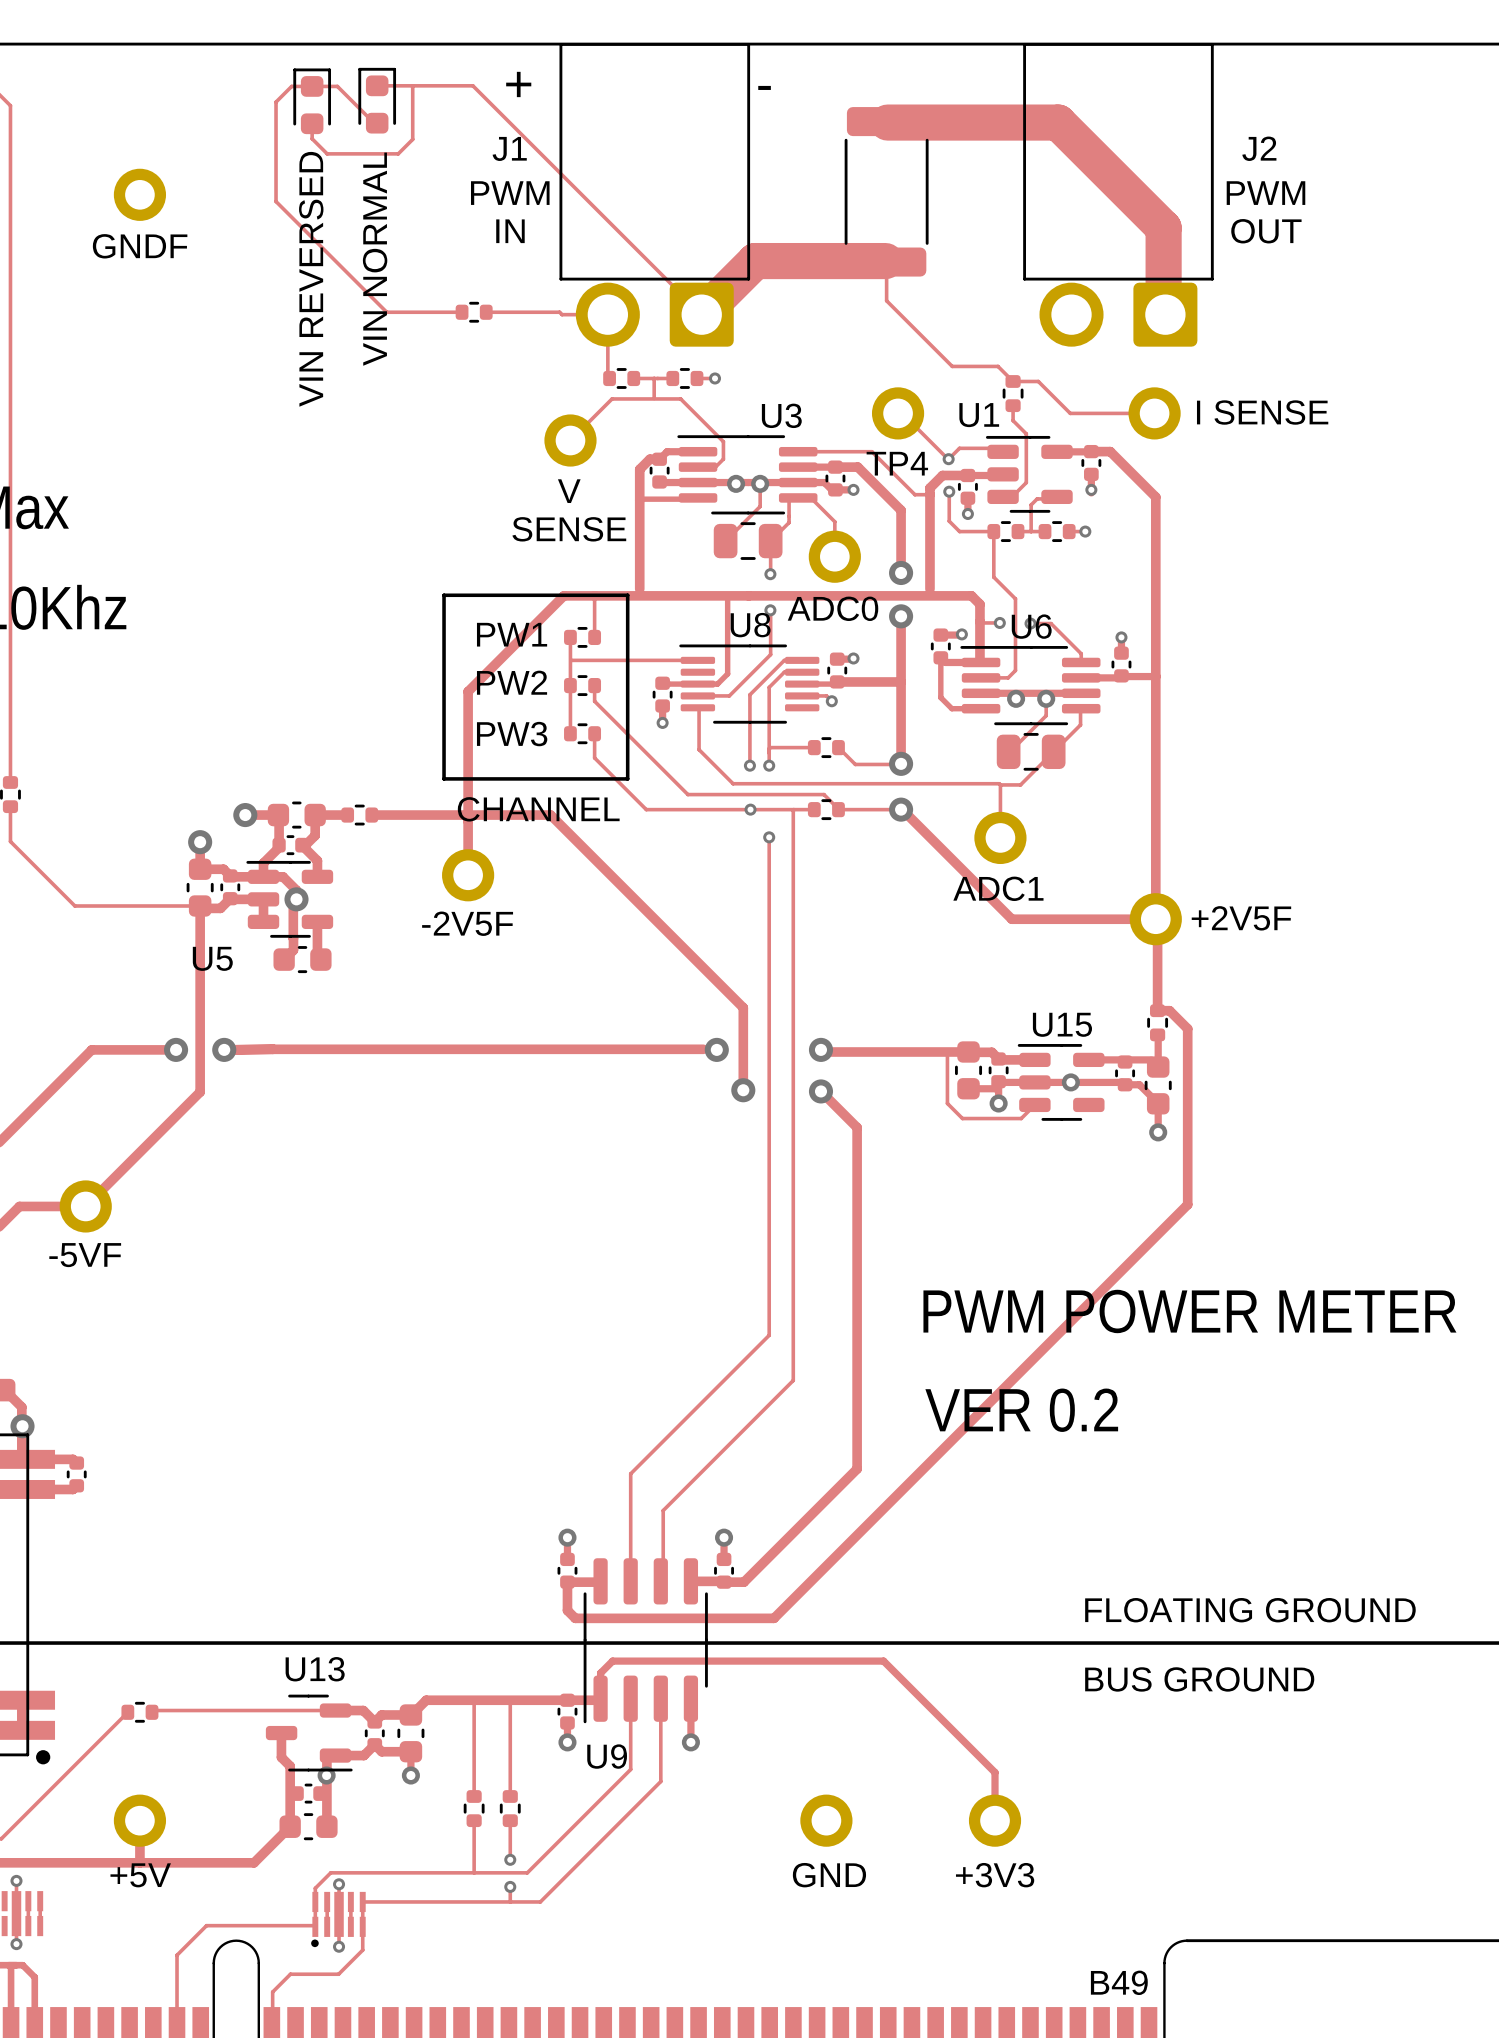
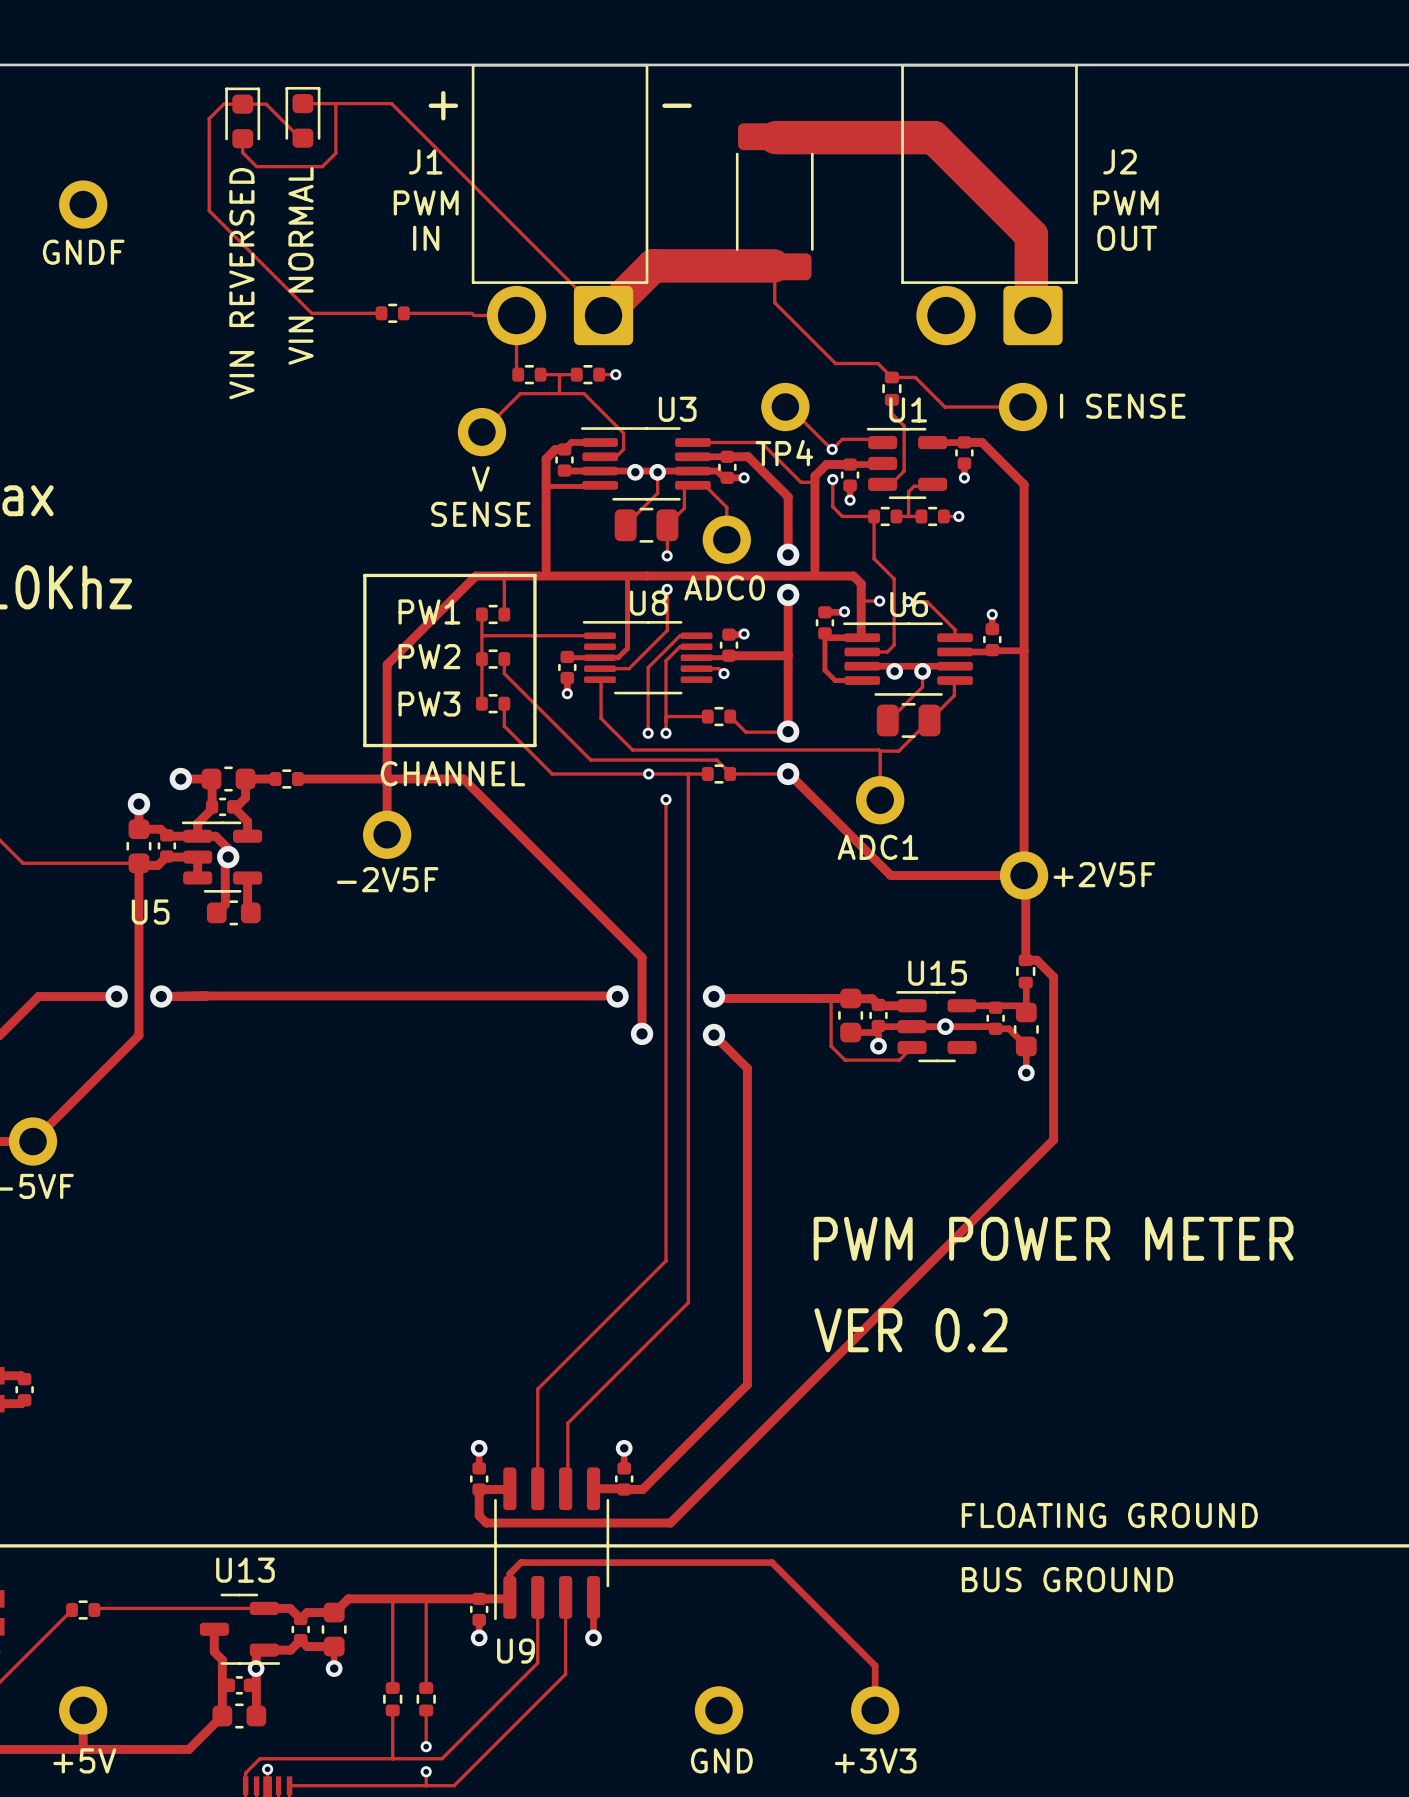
U1 name position: U1 (979, 415) -> U1 (908, 409)

